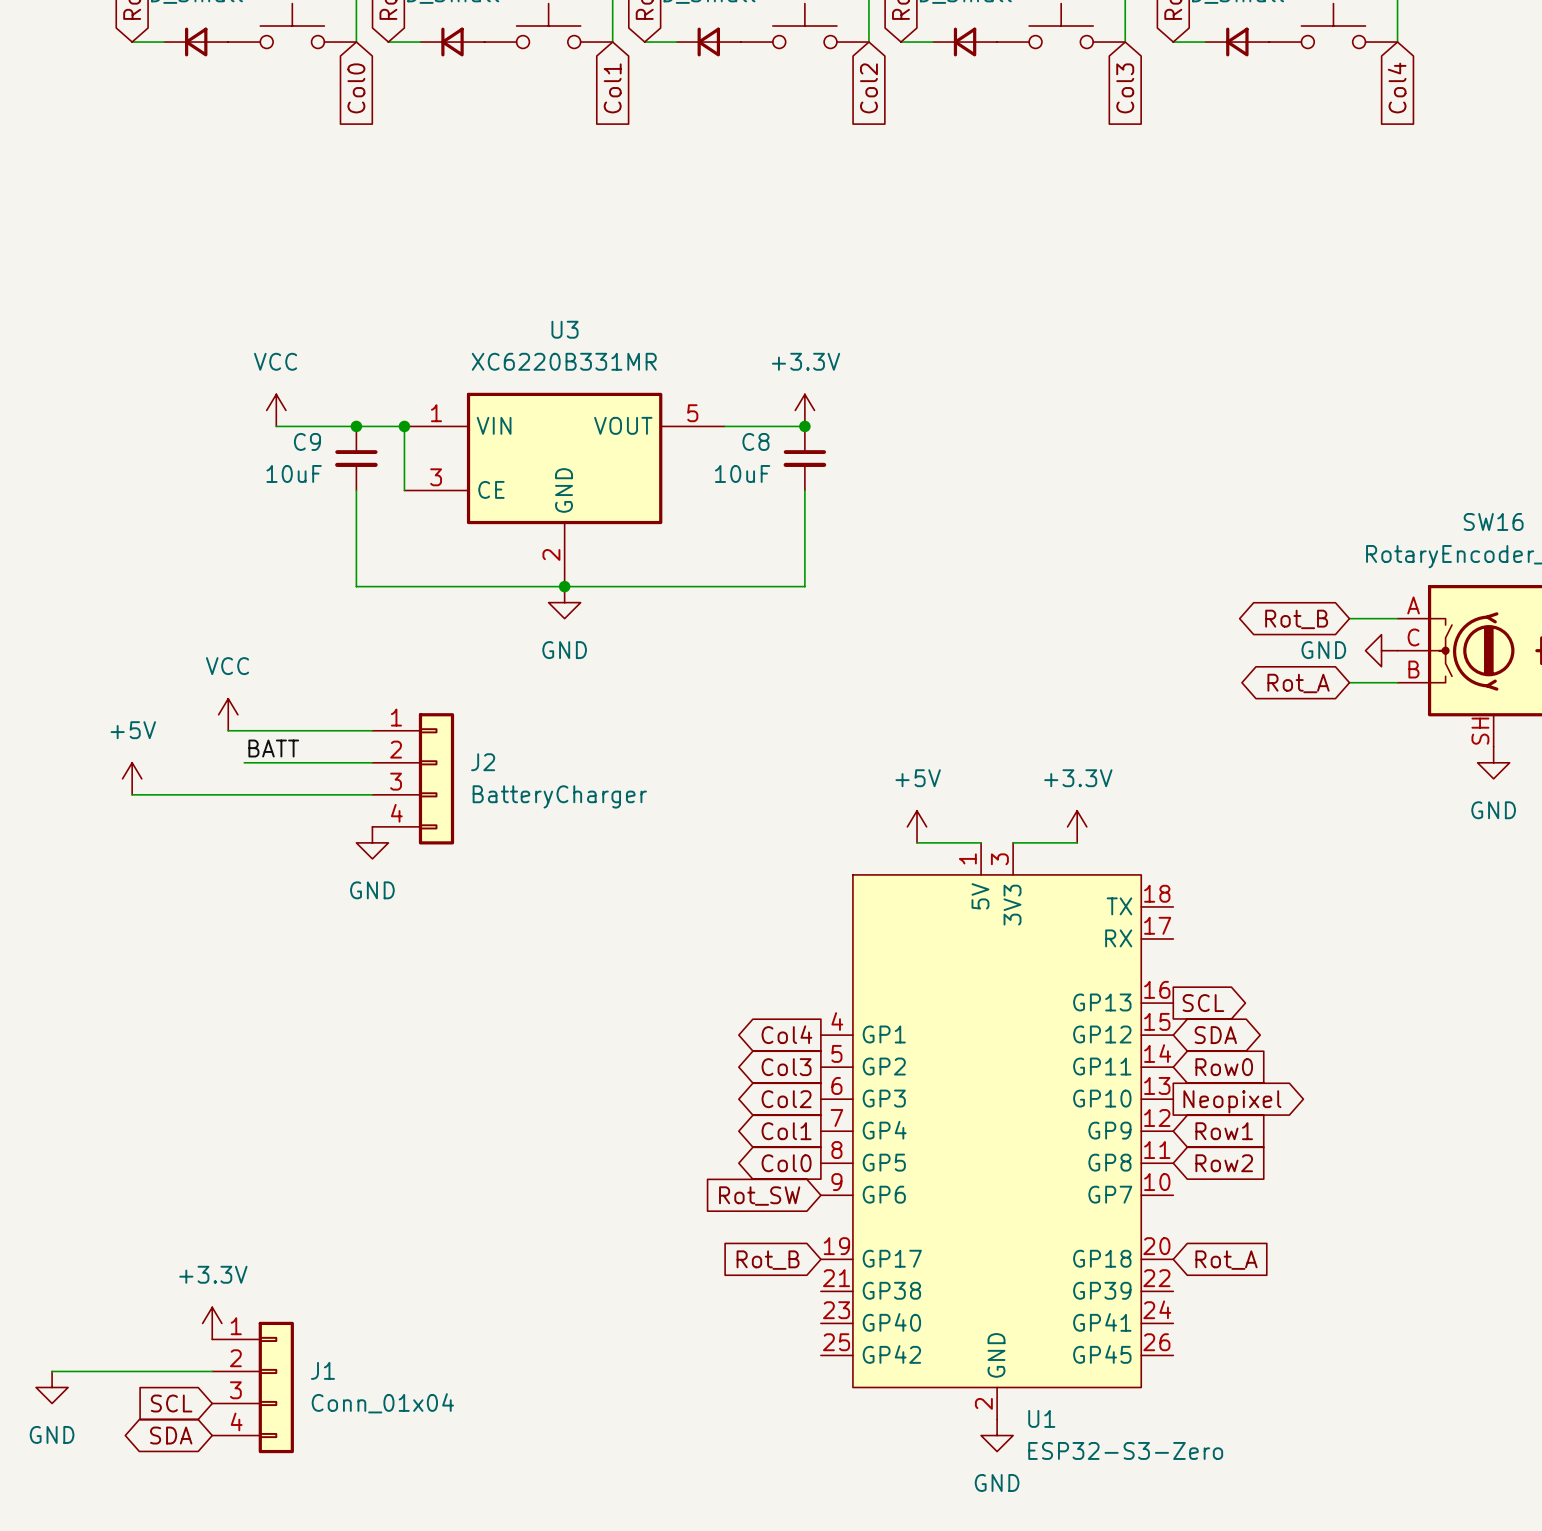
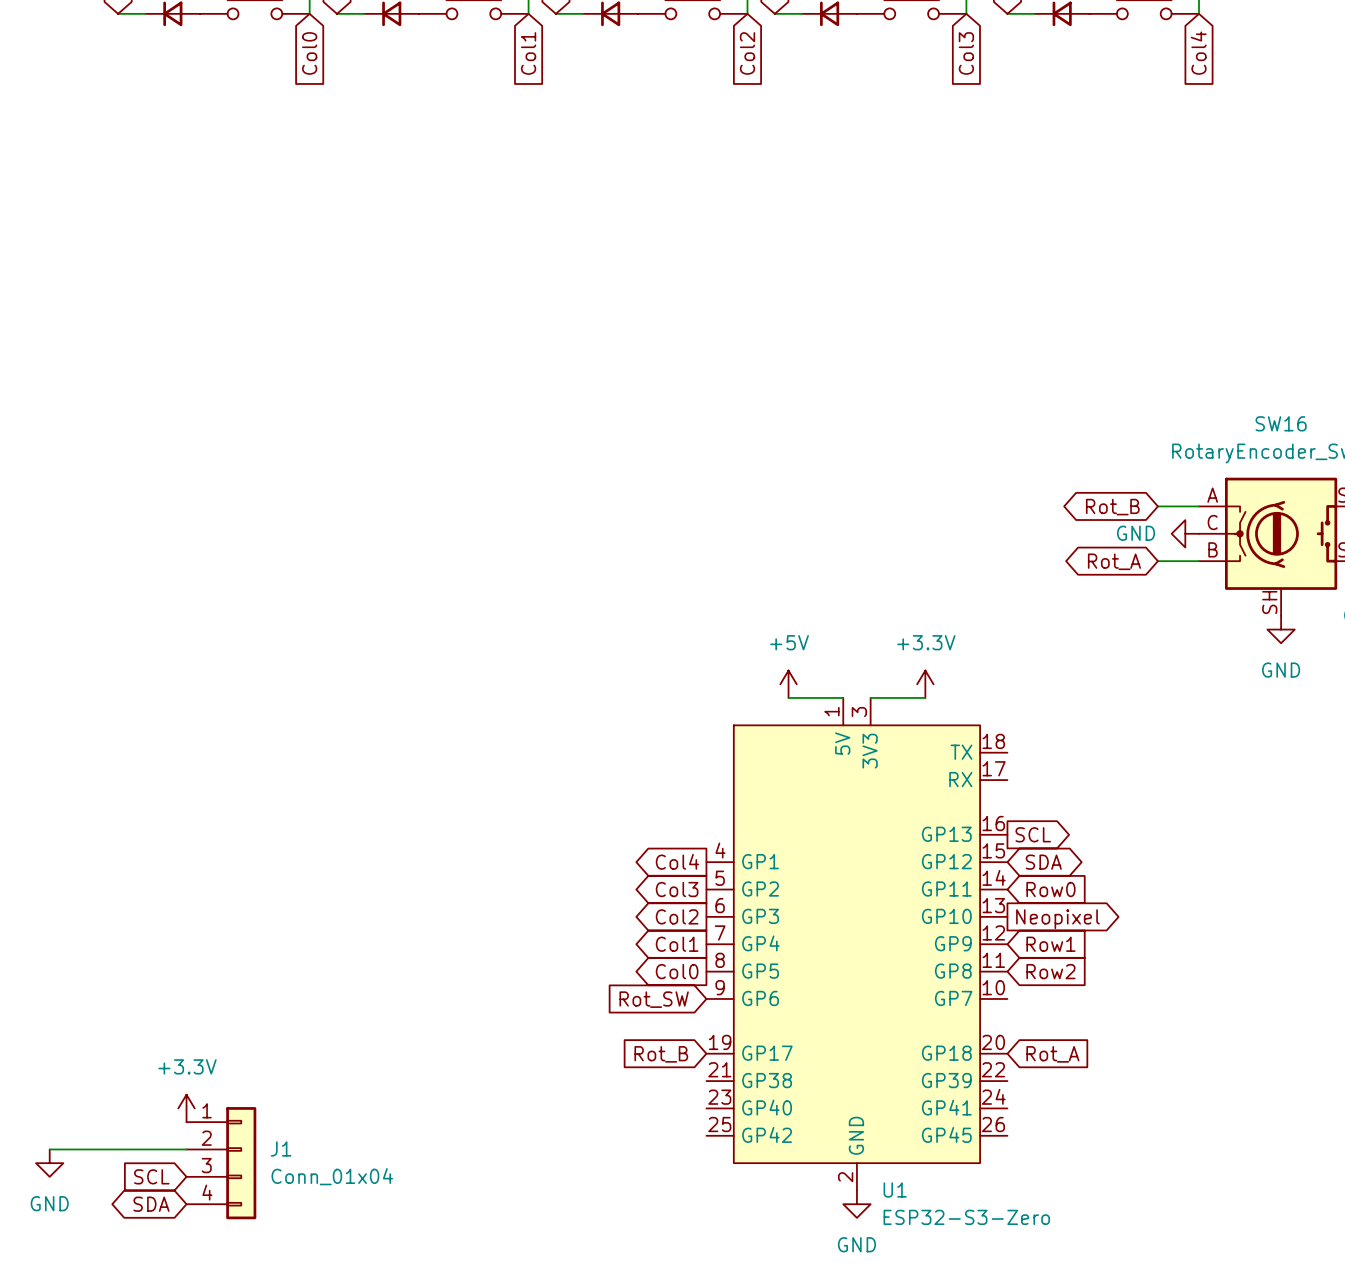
power symbol: VCC (276, 410) -> none
power symbol: +3.3V (804, 410) -> none
wire: (276, 426) (404, 426) (404, 490) -> none
junction: (356, 426) -> none
junction: (404, 426) -> none
wire: (724, 426) (804, 426) -> none
junction: (804, 426) -> none
C9: 10uF (356, 458) -> none
C8: 10uF (804, 458) -> none
U3: XC6220B331MR (564, 489) -> none
wire: (356, 490) (356, 586) (804, 586) (804, 490) -> none
junction: (564, 586) -> none
power symbol: GND (564, 602) -> none
power symbol: VCC (228, 714) -> none
wire: (228, 730) (372, 730) -> none
label: BATT (273, 748) -> none
wire: (244, 762) (372, 762) -> none
power symbol: +5V (132, 778) -> none
J2: BatteryCharger (413, 778) -> none
wire: (132, 794) (372, 794) -> none
power symbol: GND (372, 842) -> none

